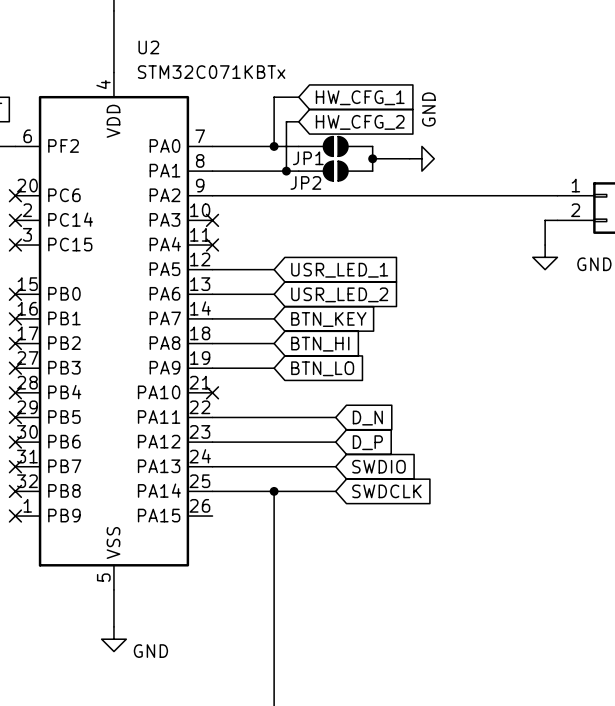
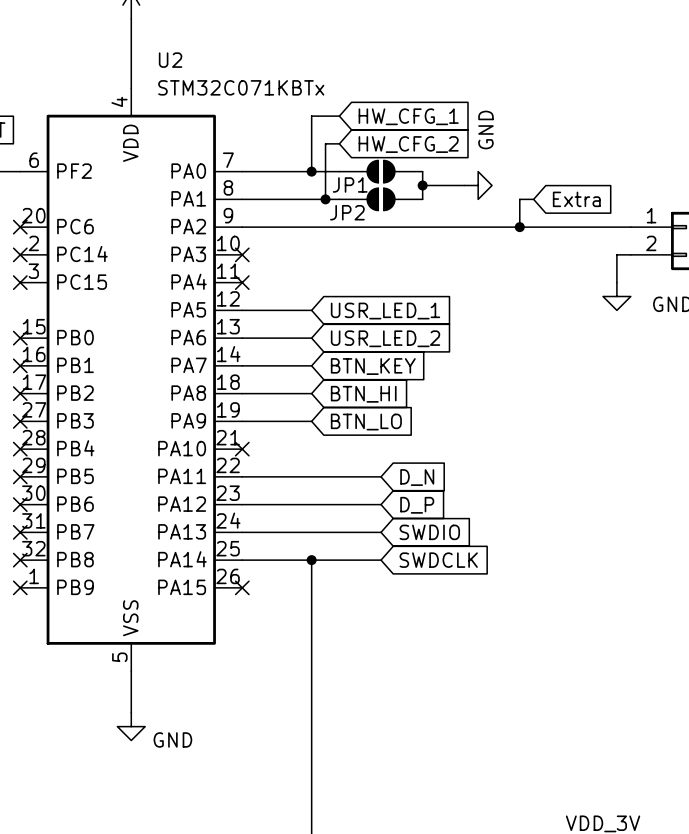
wire: none -> (533, 199) (519, 199) (519, 227)
global label: none -> Extra (576, 199)
junction: none -> (519, 227)
no-connect mark: none -> (242, 587)

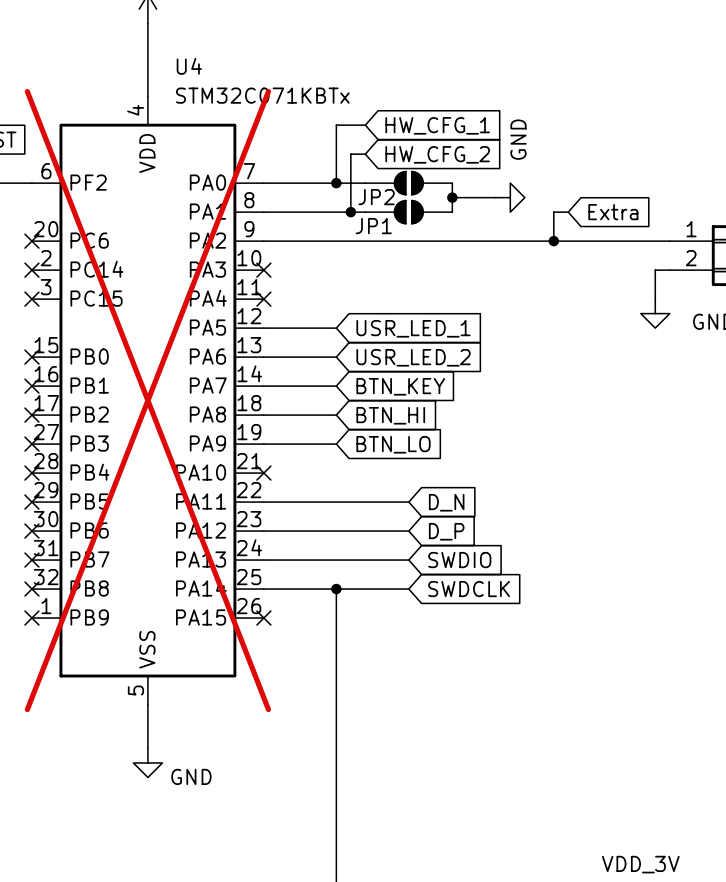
U2 name: U2 (170, 60) -> U4 (189, 66)
JP1 name: JP1 (350, 184) -> JP2 (376, 197)
JP2 name: JP2 (347, 212) -> JP1 (373, 226)
U2 do-not-place cross: none -> (147, 400)

